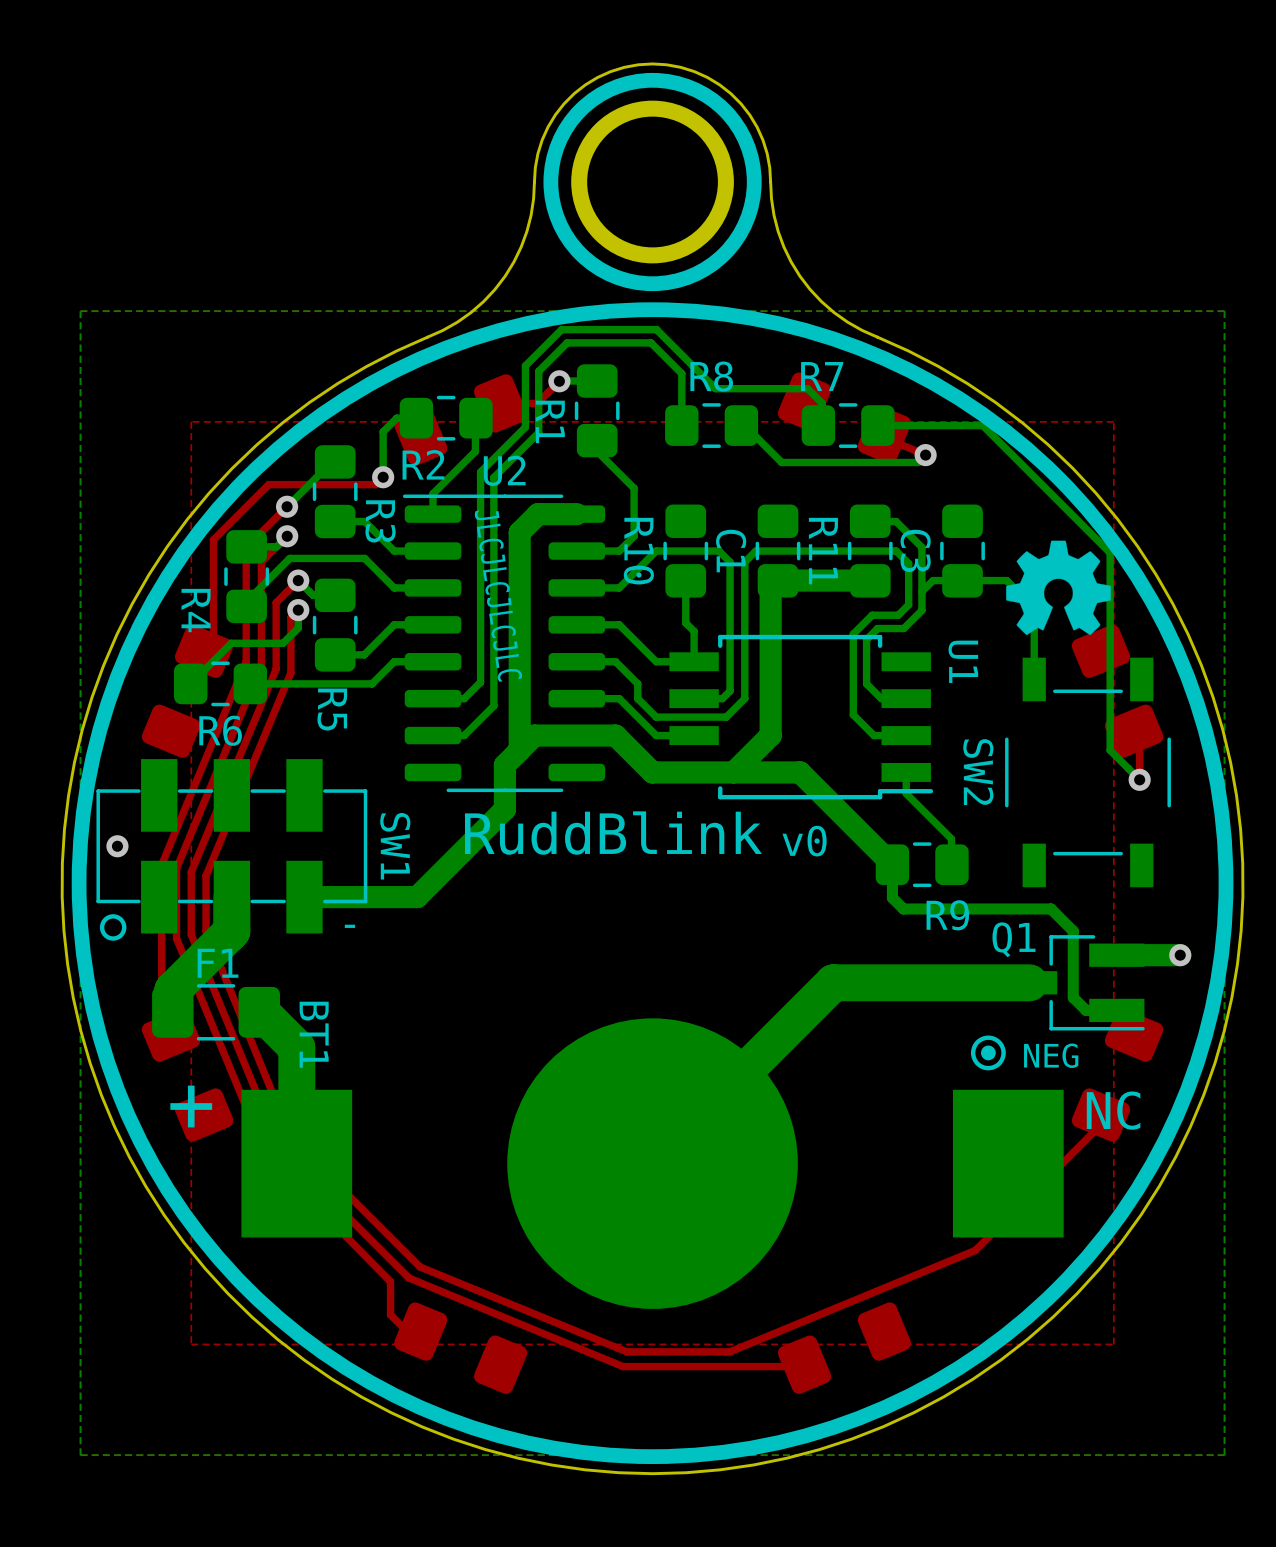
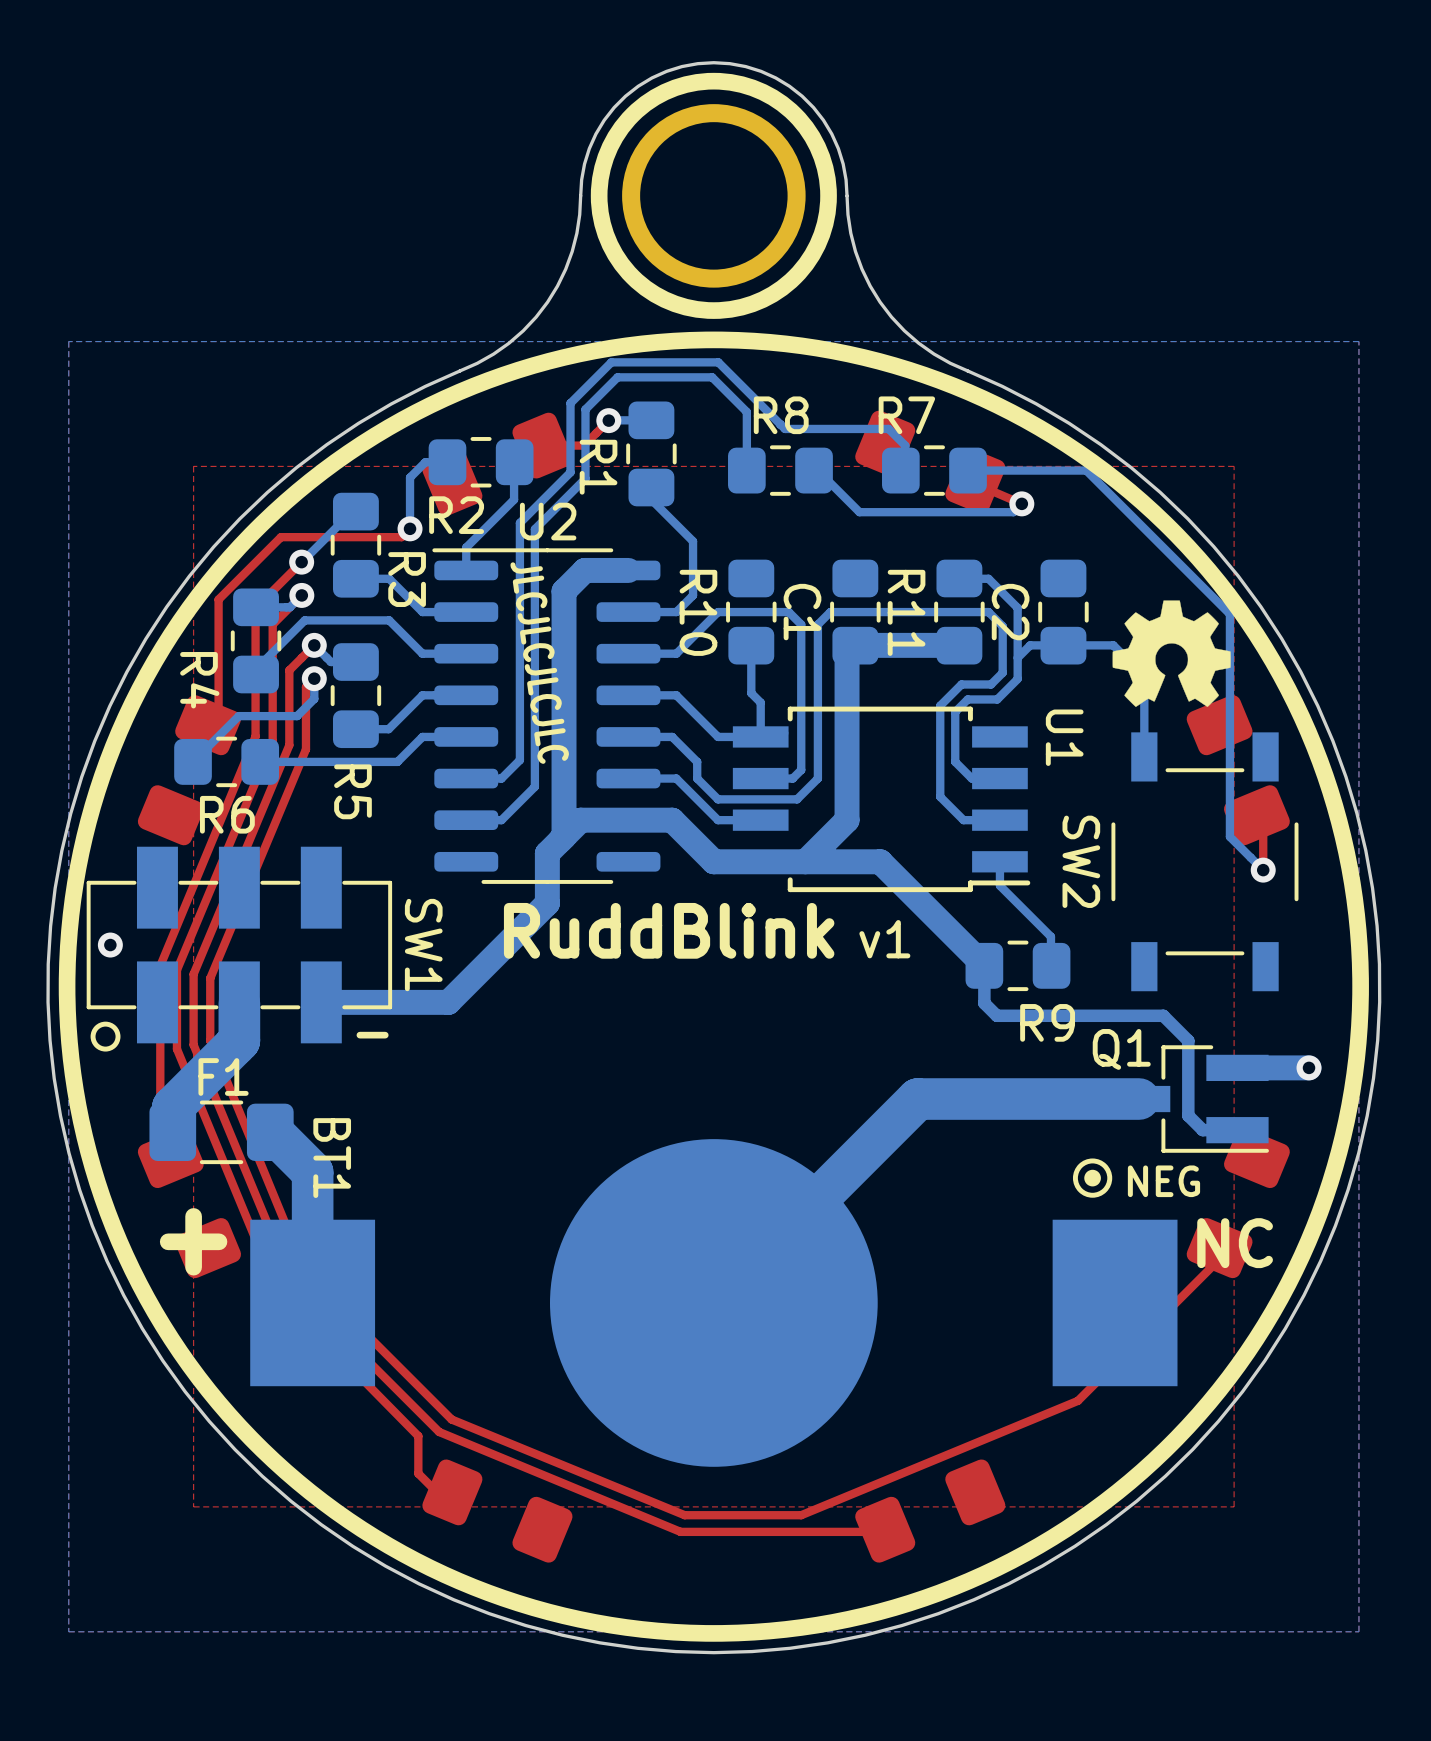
C3 name: C3 (915, 550) -> C2 (1010, 612)
text: v0 (804, 841) -> v1 (884, 939)

